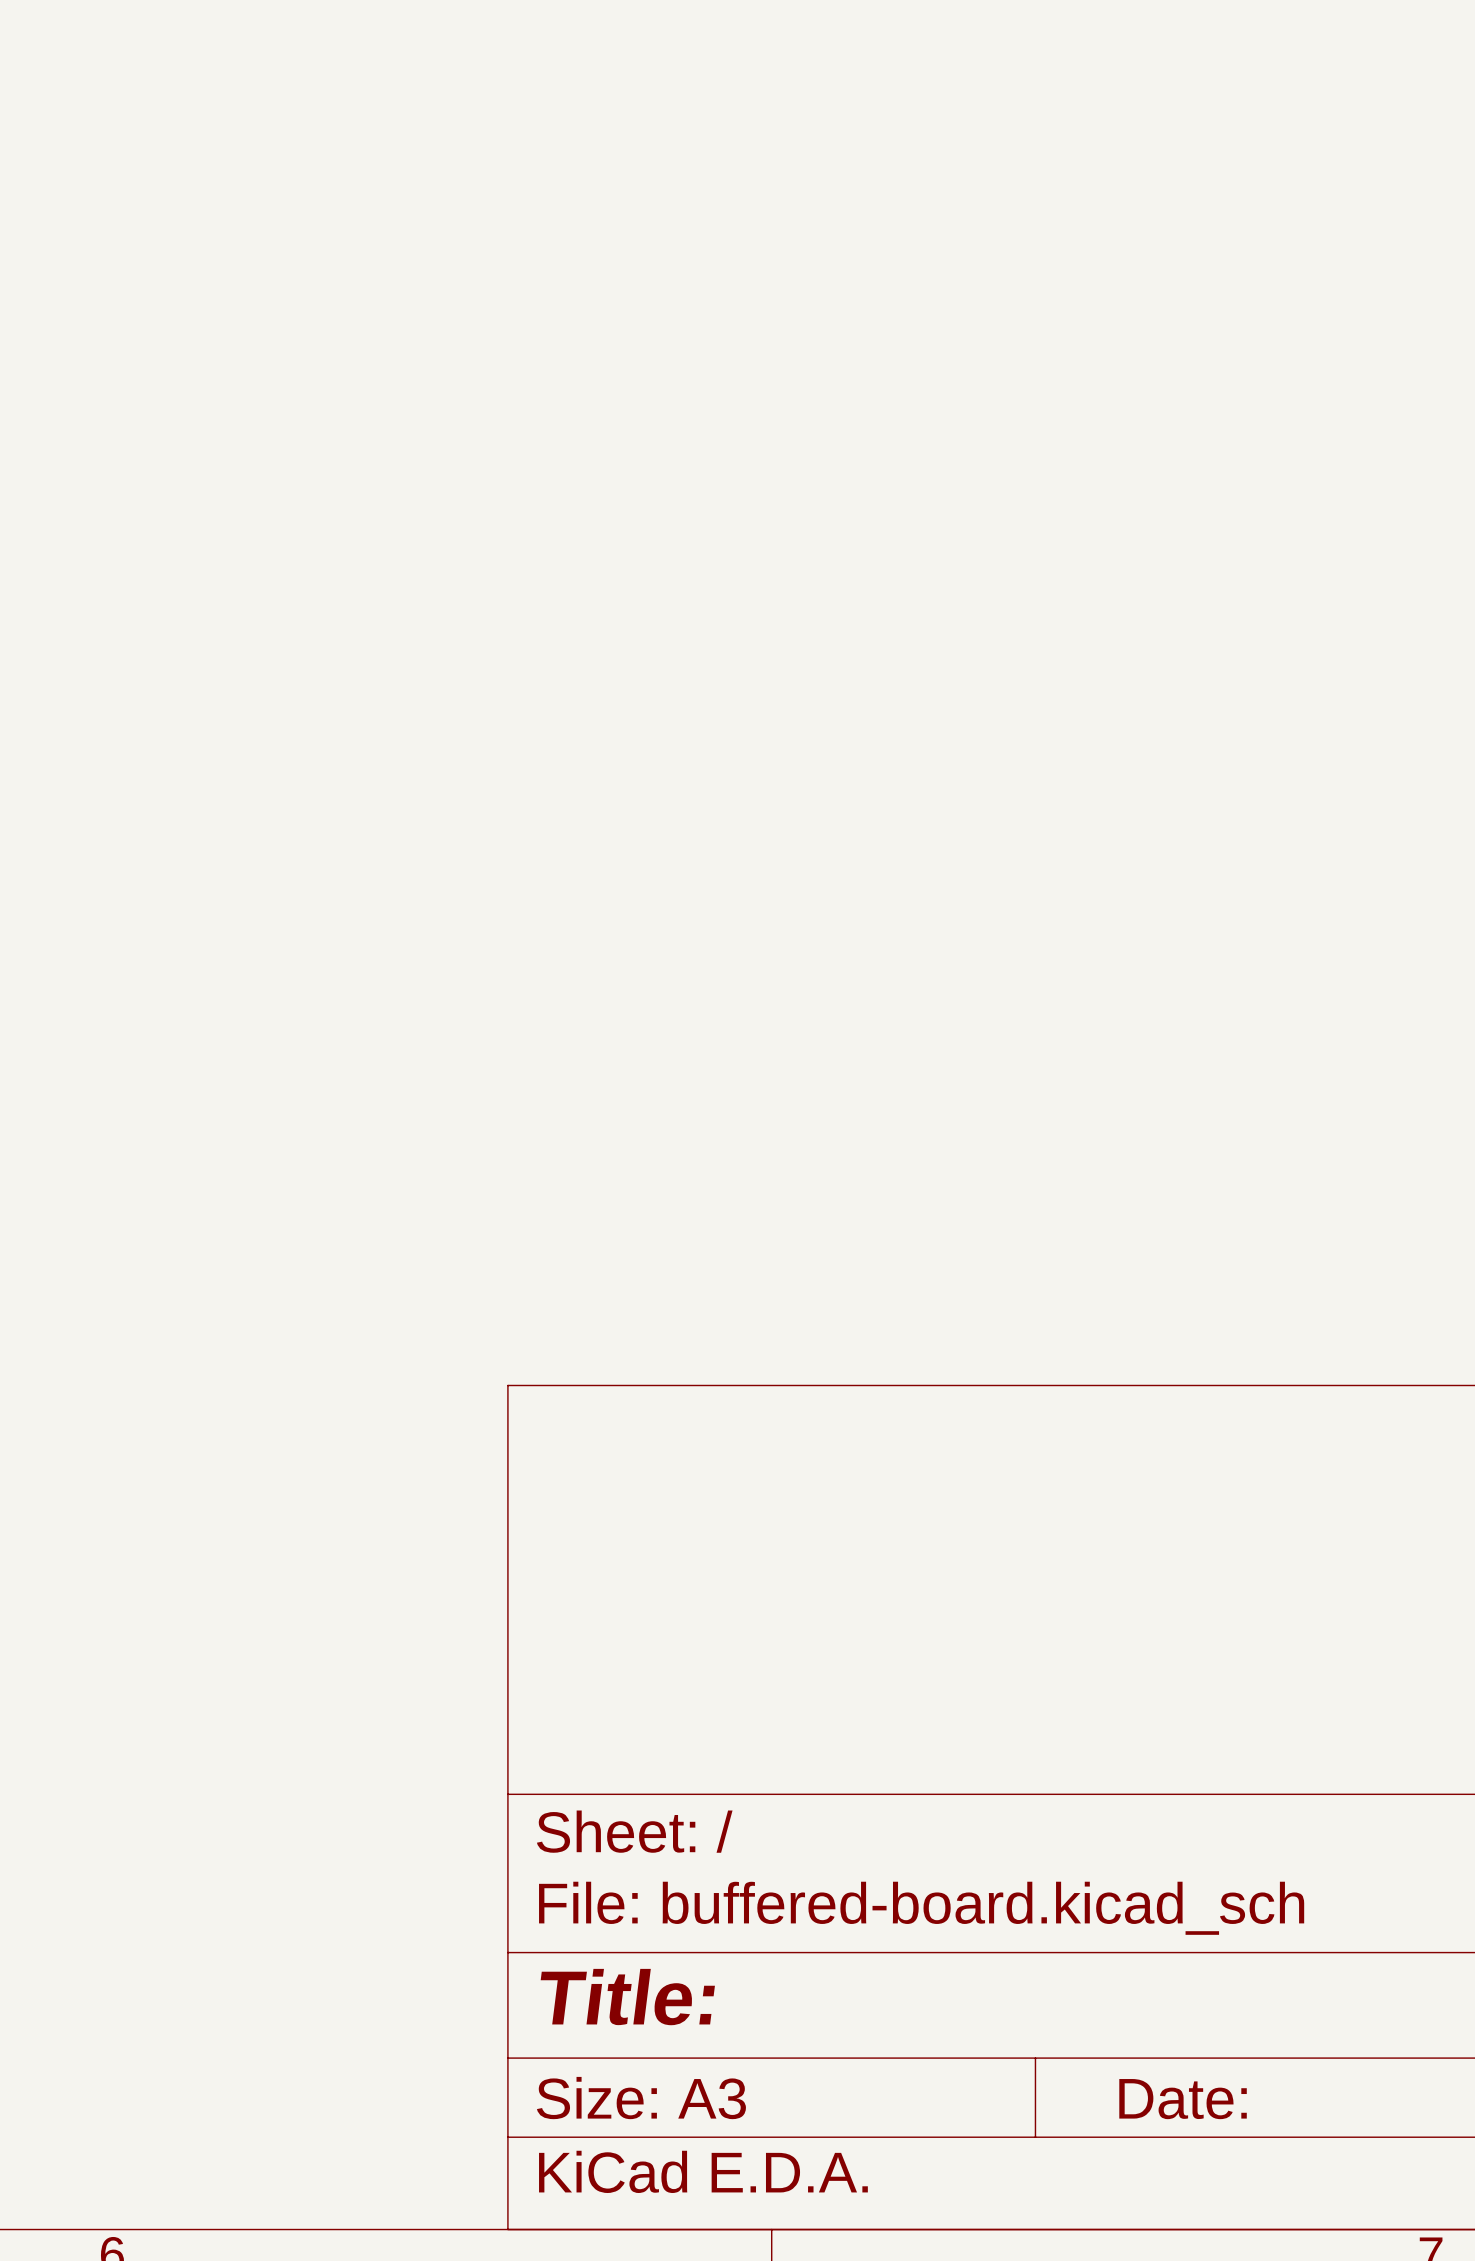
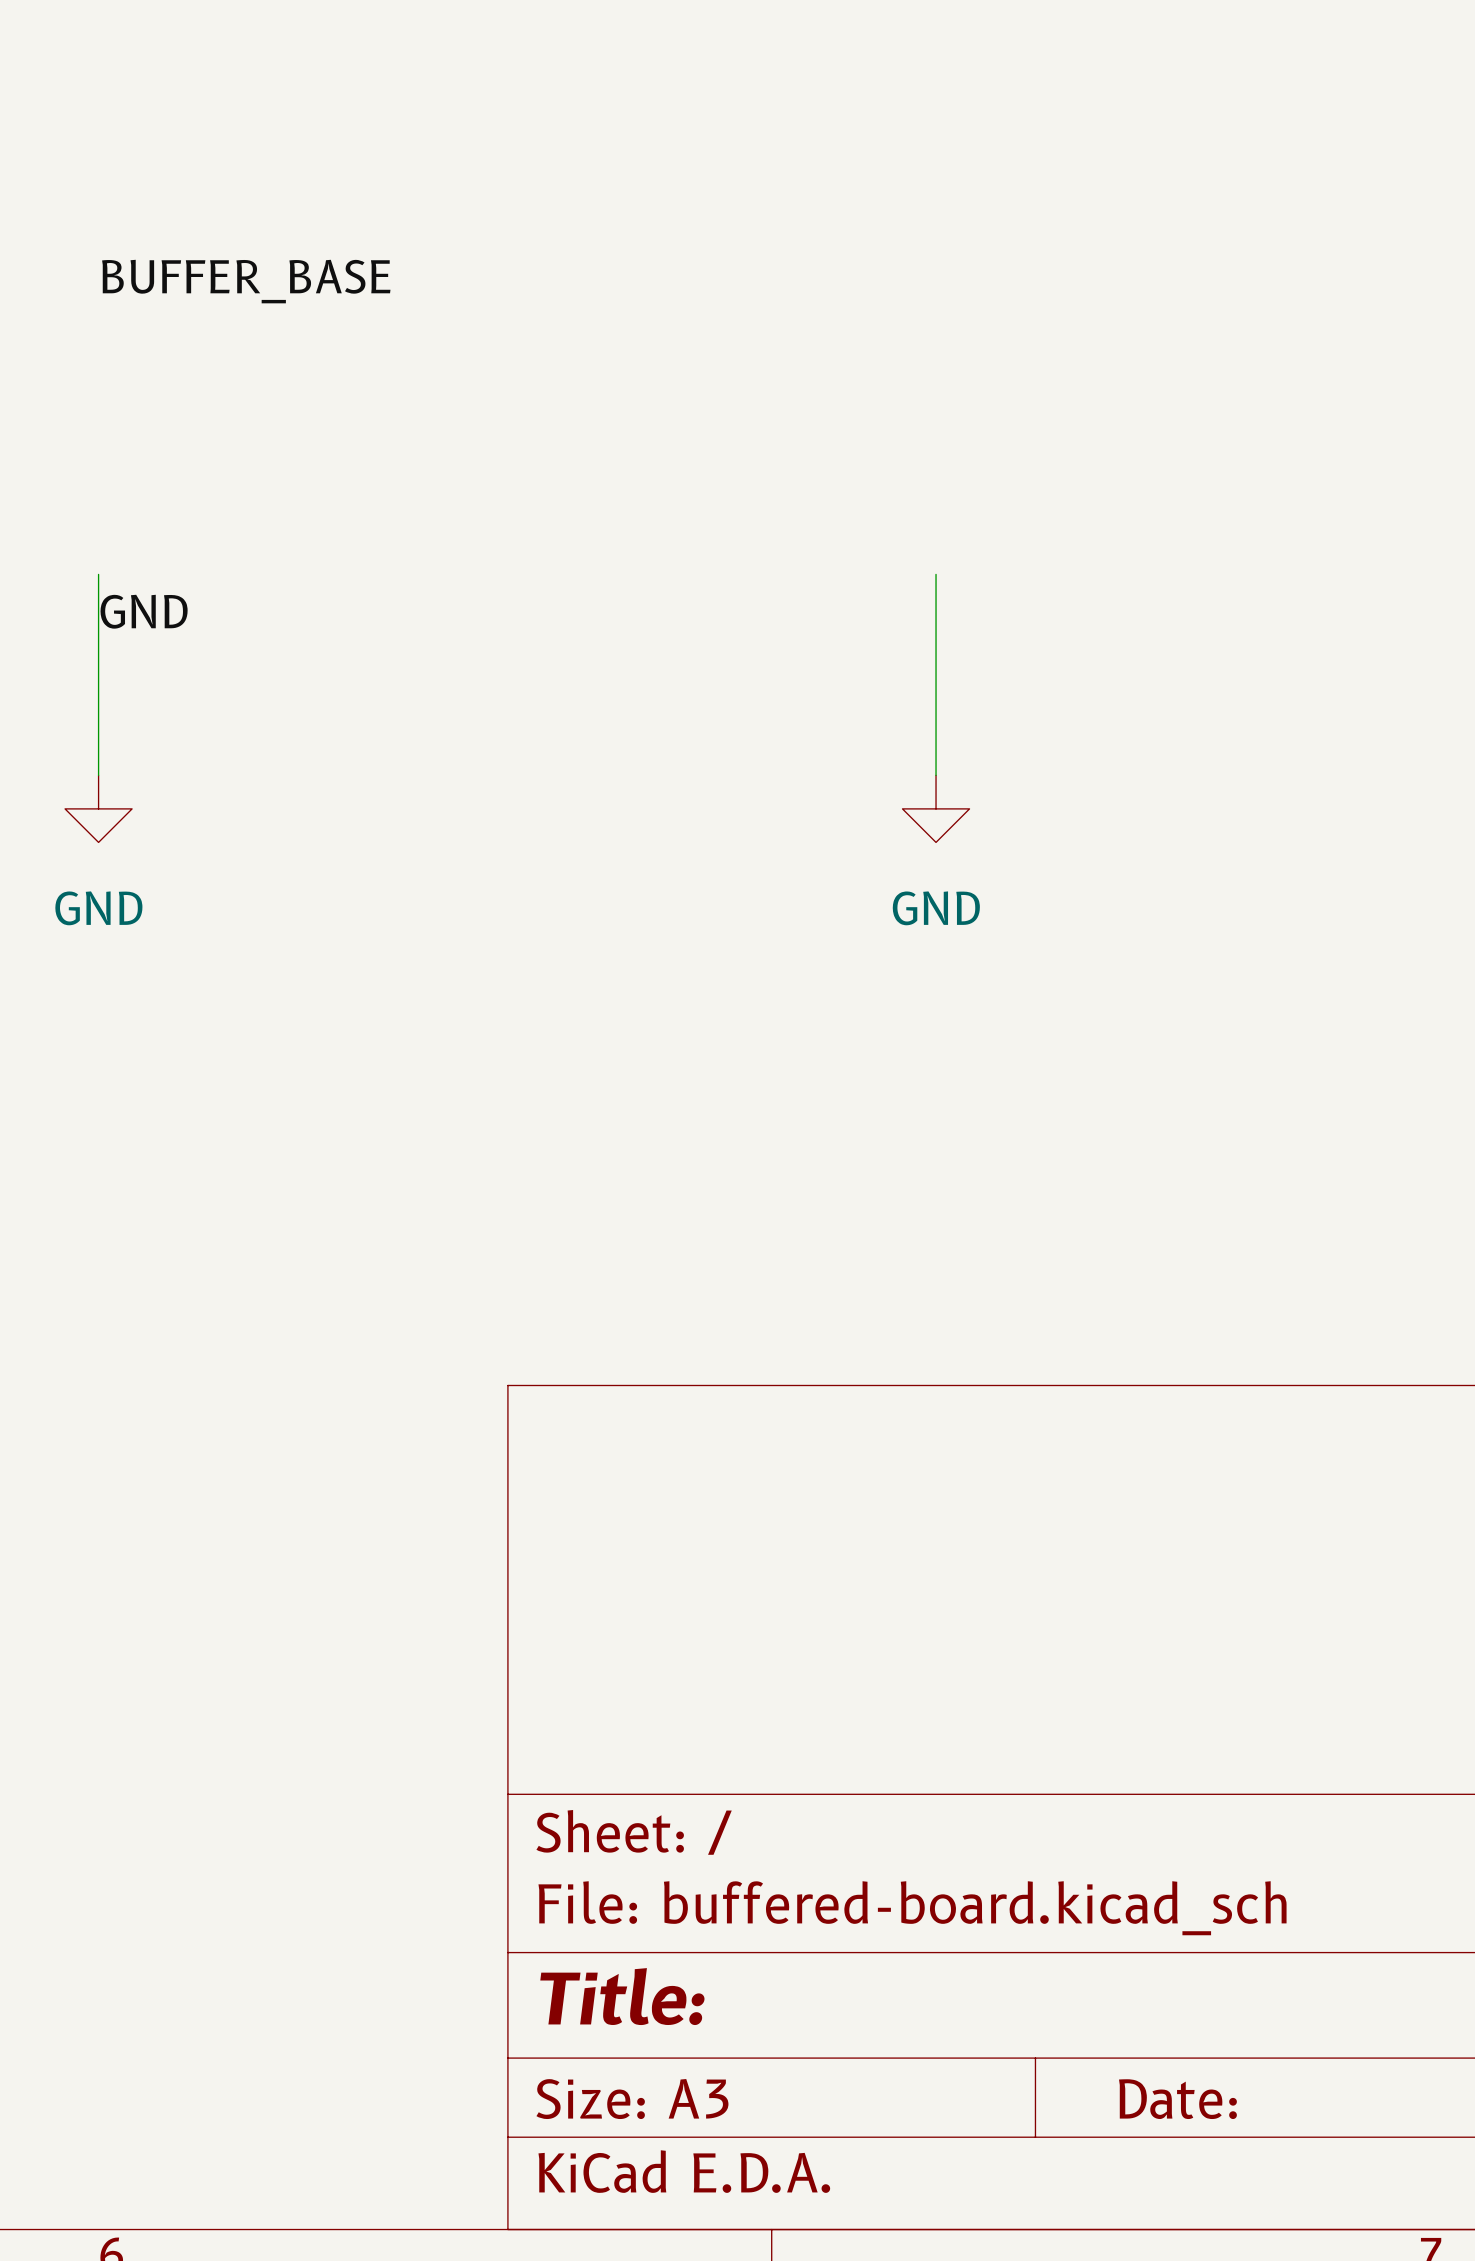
label: none -> BUFFER_BASE (246, 281)
wire: none -> (98, 574) (98, 775)
wire: none -> (936, 574) (936, 775)
label: none -> GND (144, 611)
power symbol: none -> GND (98, 808)
power symbol: none -> GND (936, 808)

